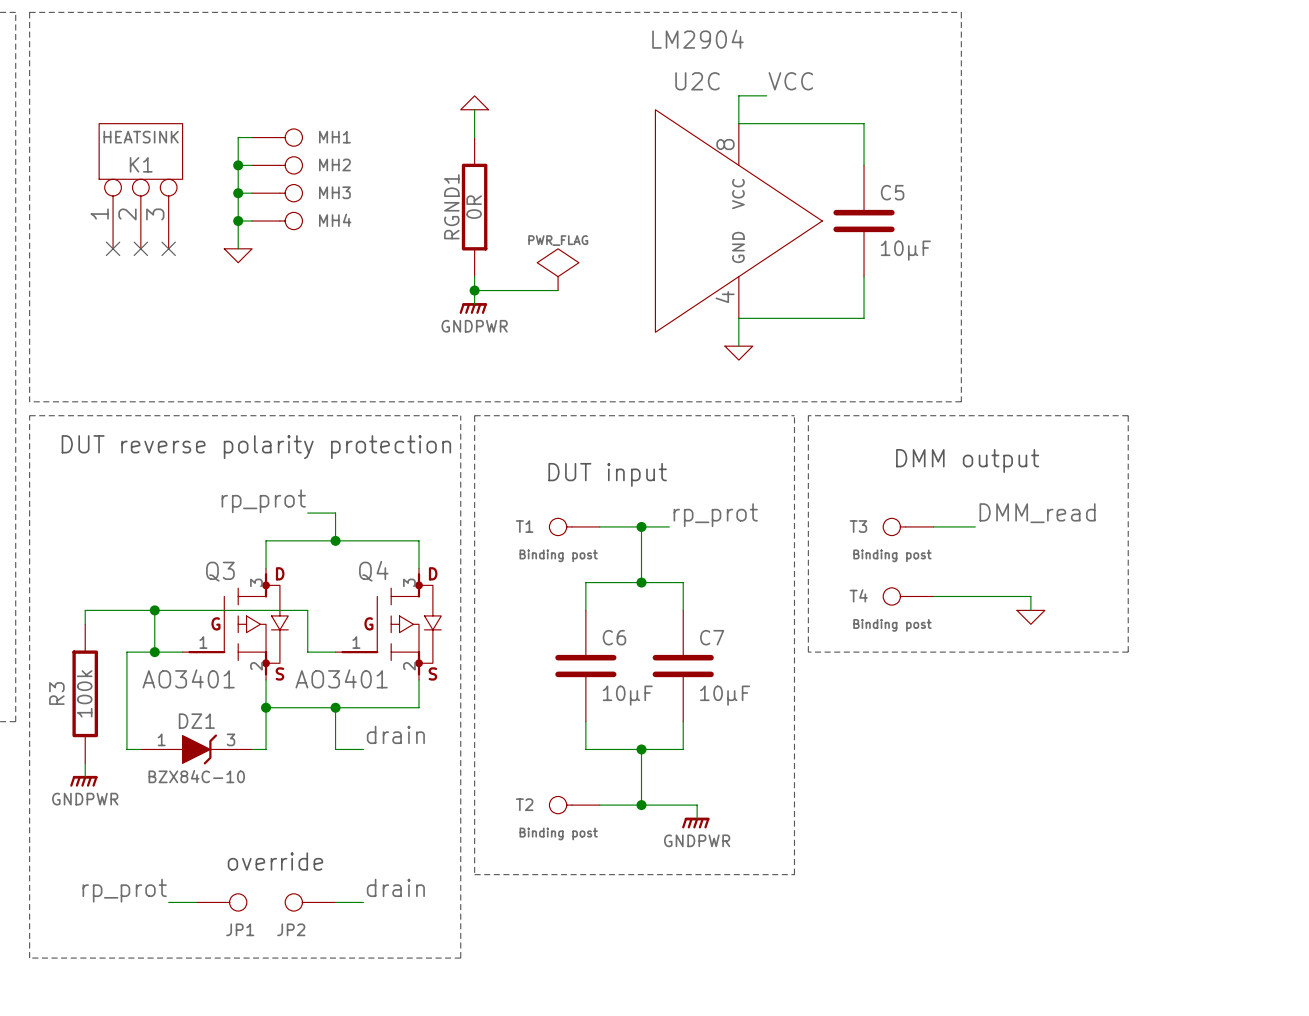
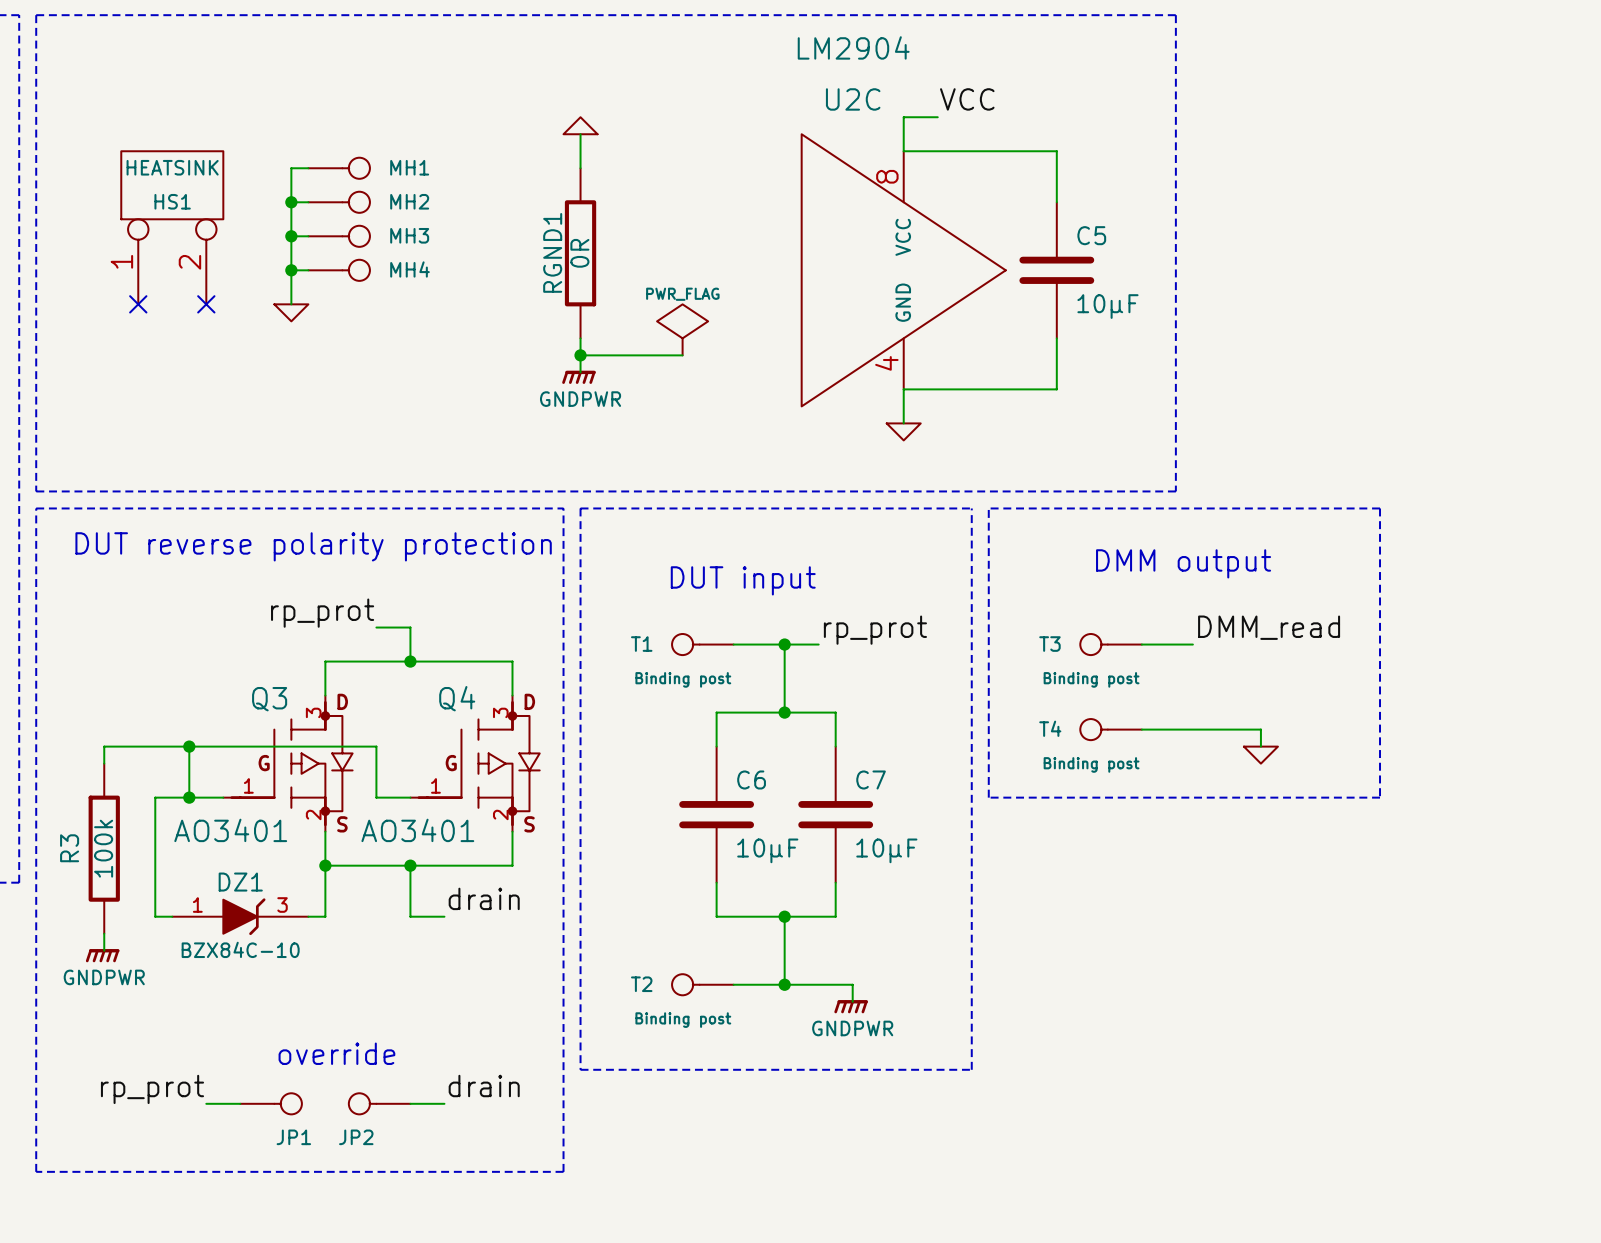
K1: HEATSINK (140, 186) -> none
HS1: none -> HEATSINK (172, 227)
no-connect mark: (140, 248) -> none

